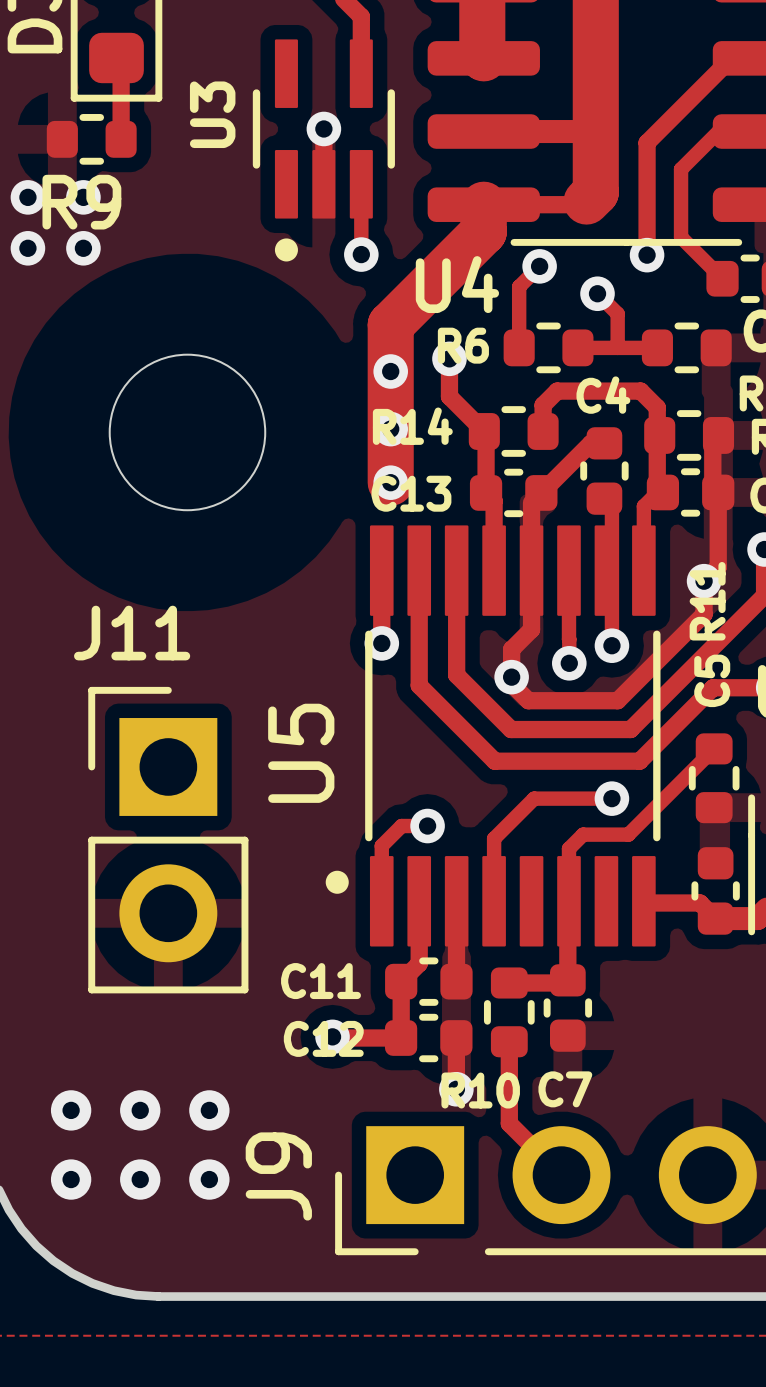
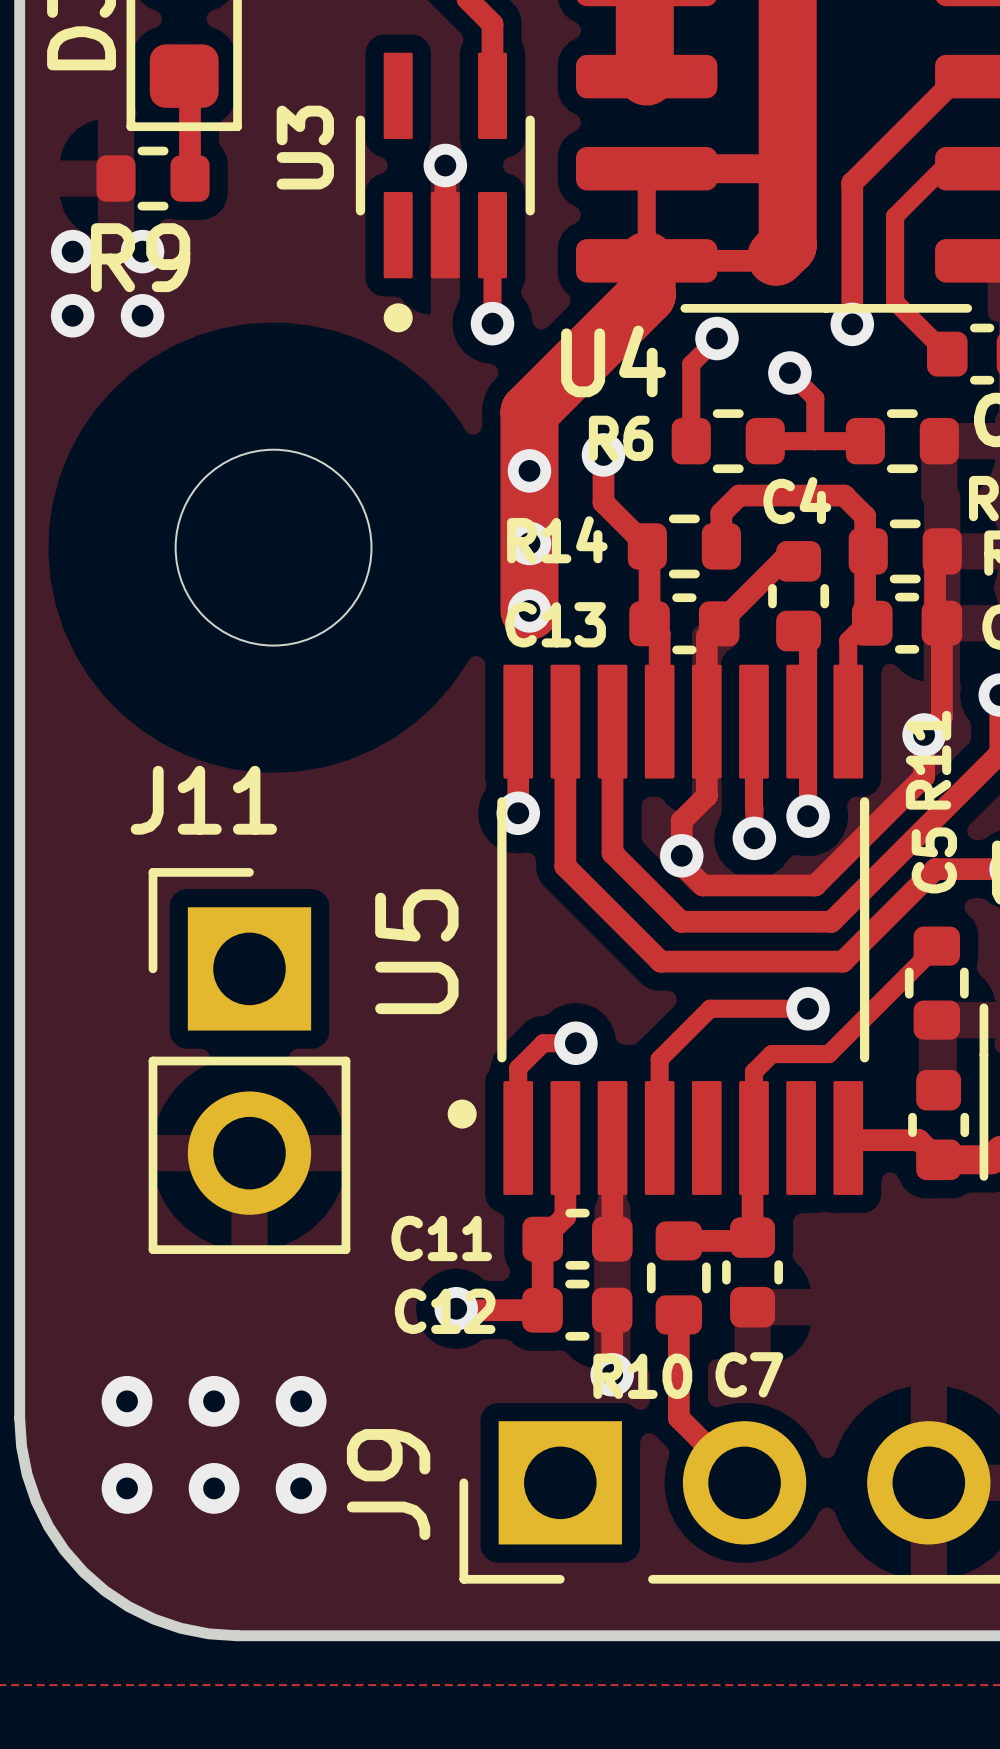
track: none -> (646, 168) (646, 260)

